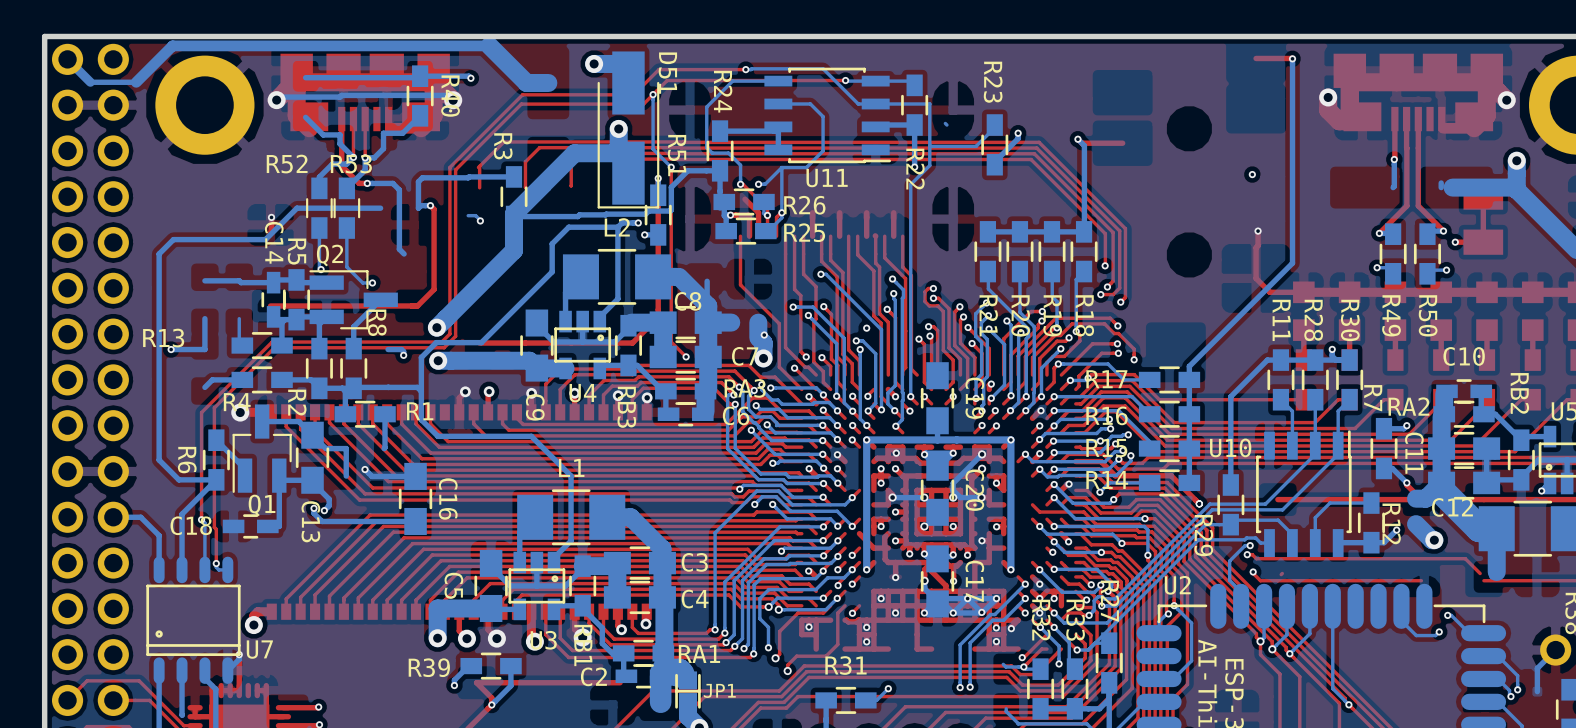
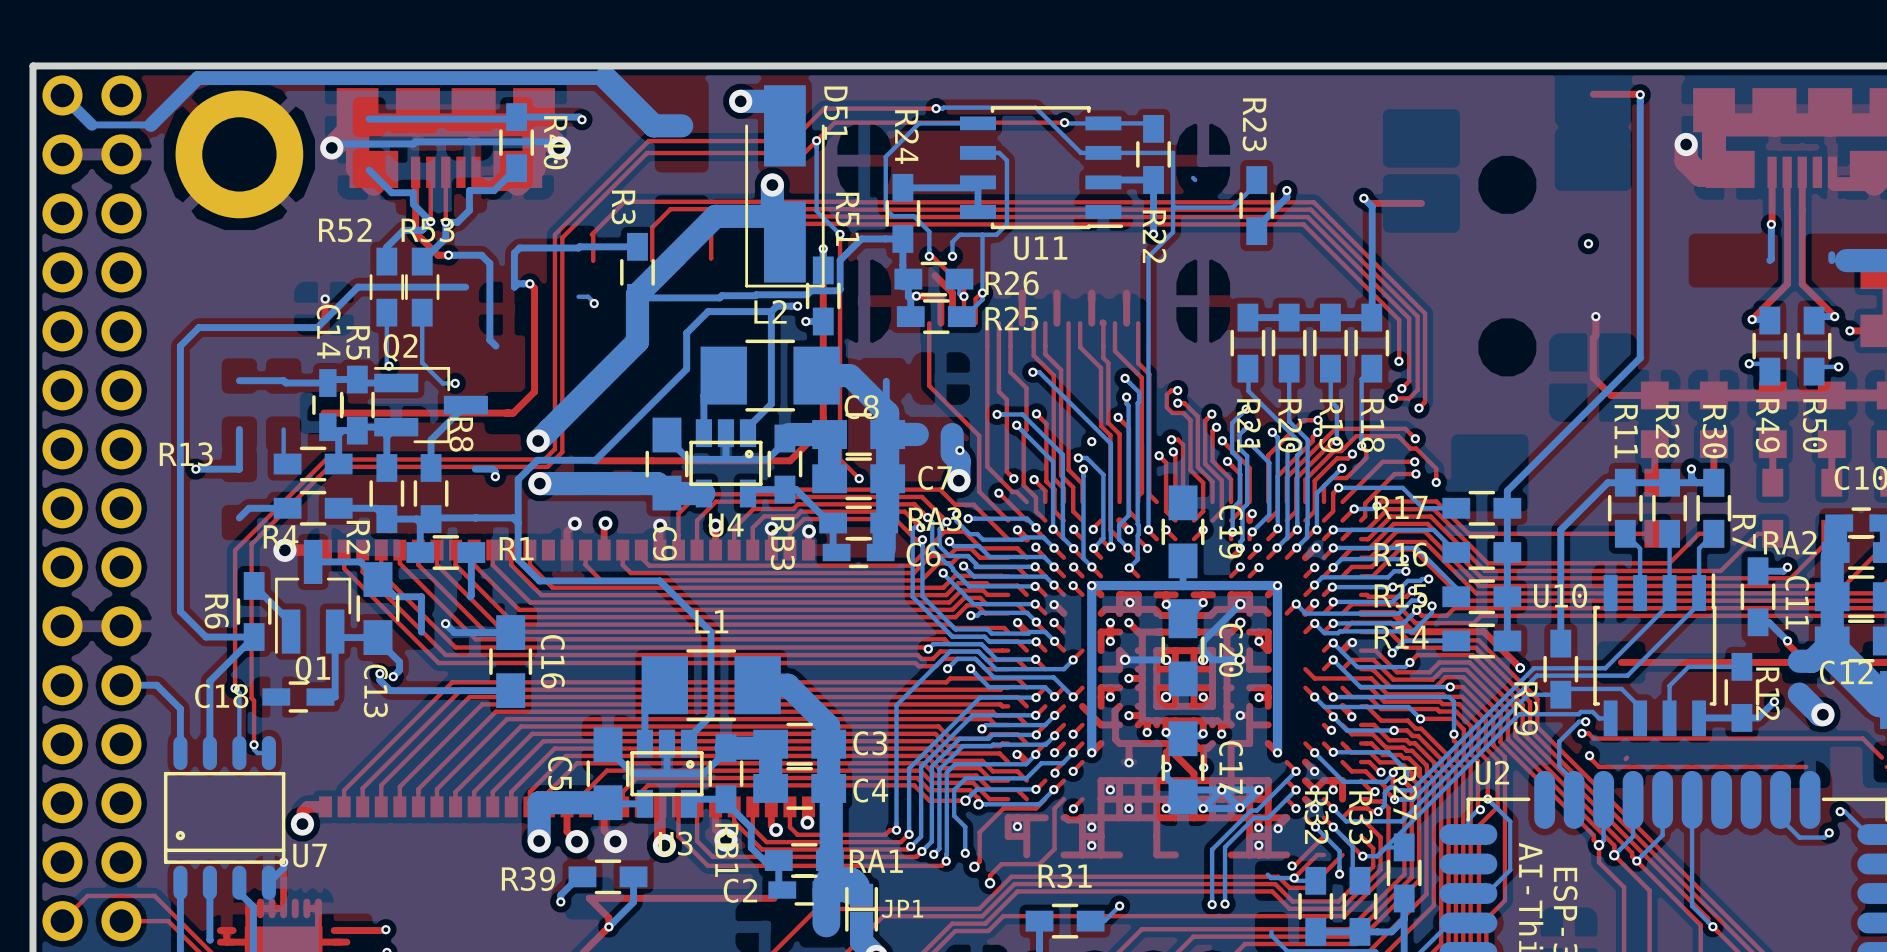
bottom track: (794, 104) (810, 104) (823, 116) (823, 150) (806, 167) (792, 167) -> (999, 152) (1006, 160) (1006, 224) (996, 234)
bottom track: (781, 167) (765, 184) (758, 184) -> (982, 234) (959, 234) (952, 242) (952, 256)

